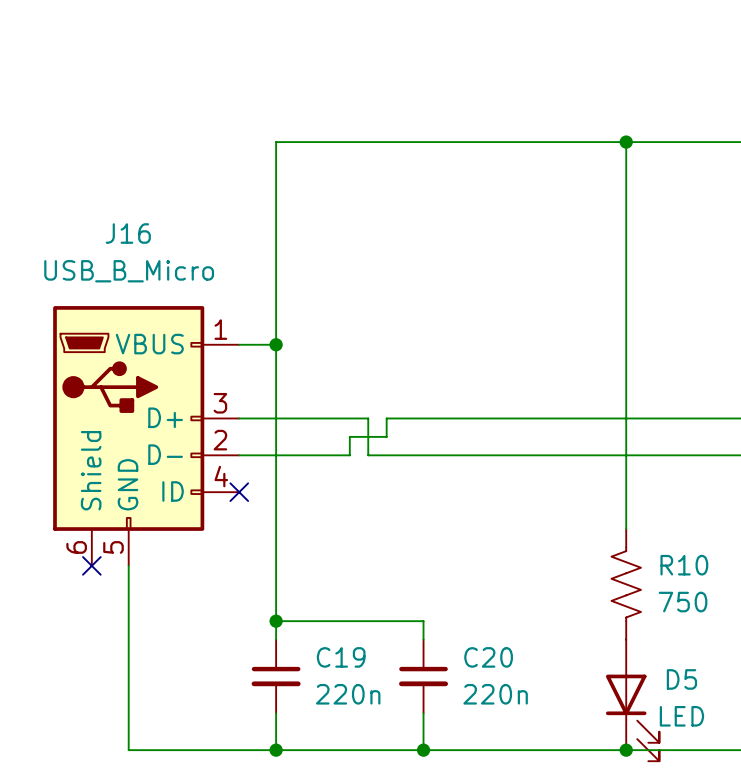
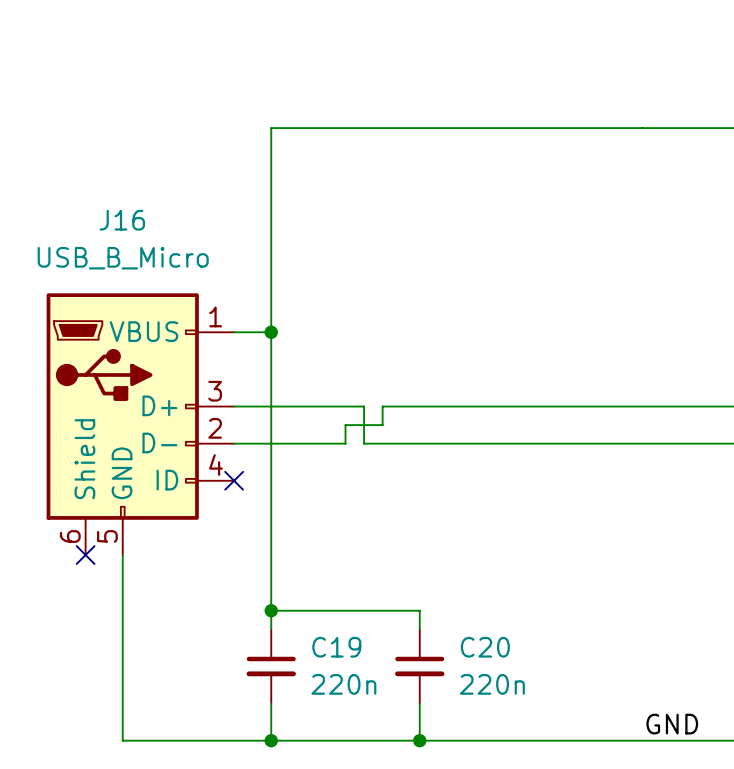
wire: (626, 142) (626, 529) -> none
junction: (626, 142) -> none
R10: 750 (626, 584) -> none
D5: LED (632, 700) -> none
label: none -> GND (672, 724)
junction: (626, 750) -> none

